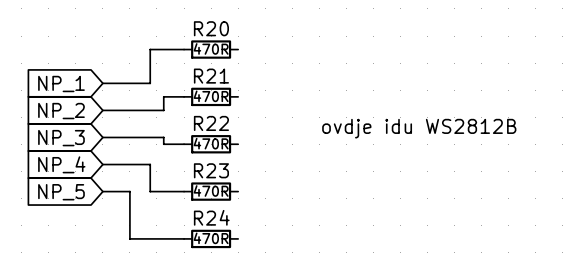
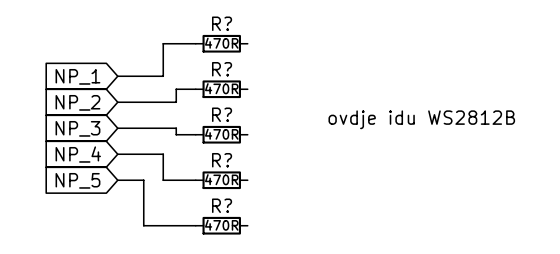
R20 name: R20 (211, 28) -> R? (222, 23)
R21 name: R21 (211, 76) -> R? (222, 69)
R22 name: R22 (211, 123) -> R? (222, 114)
R23 name: R23 (211, 170) -> R? (222, 160)
R24 name: R24 (211, 217) -> R? (222, 205)

